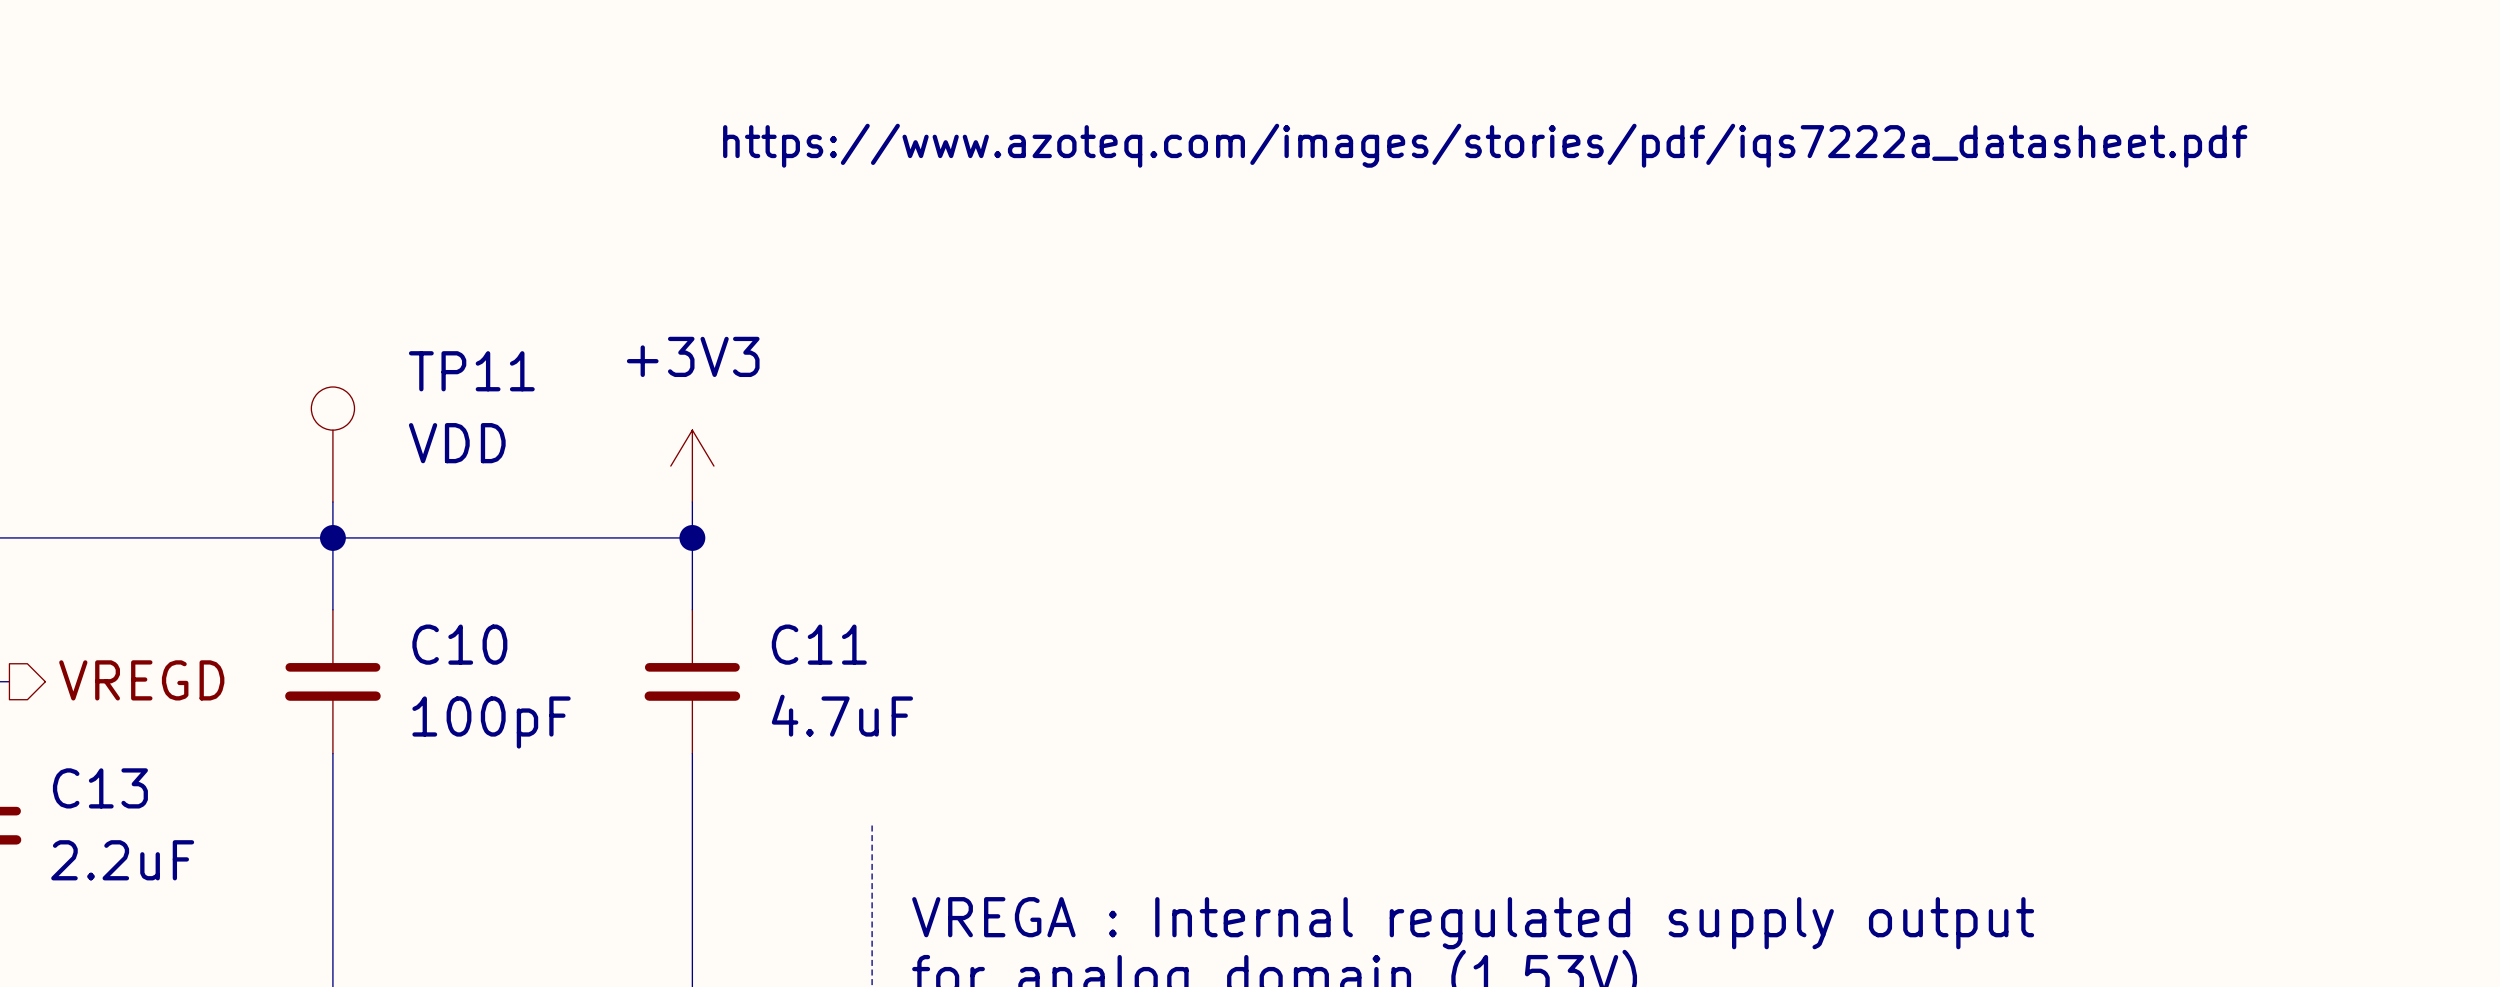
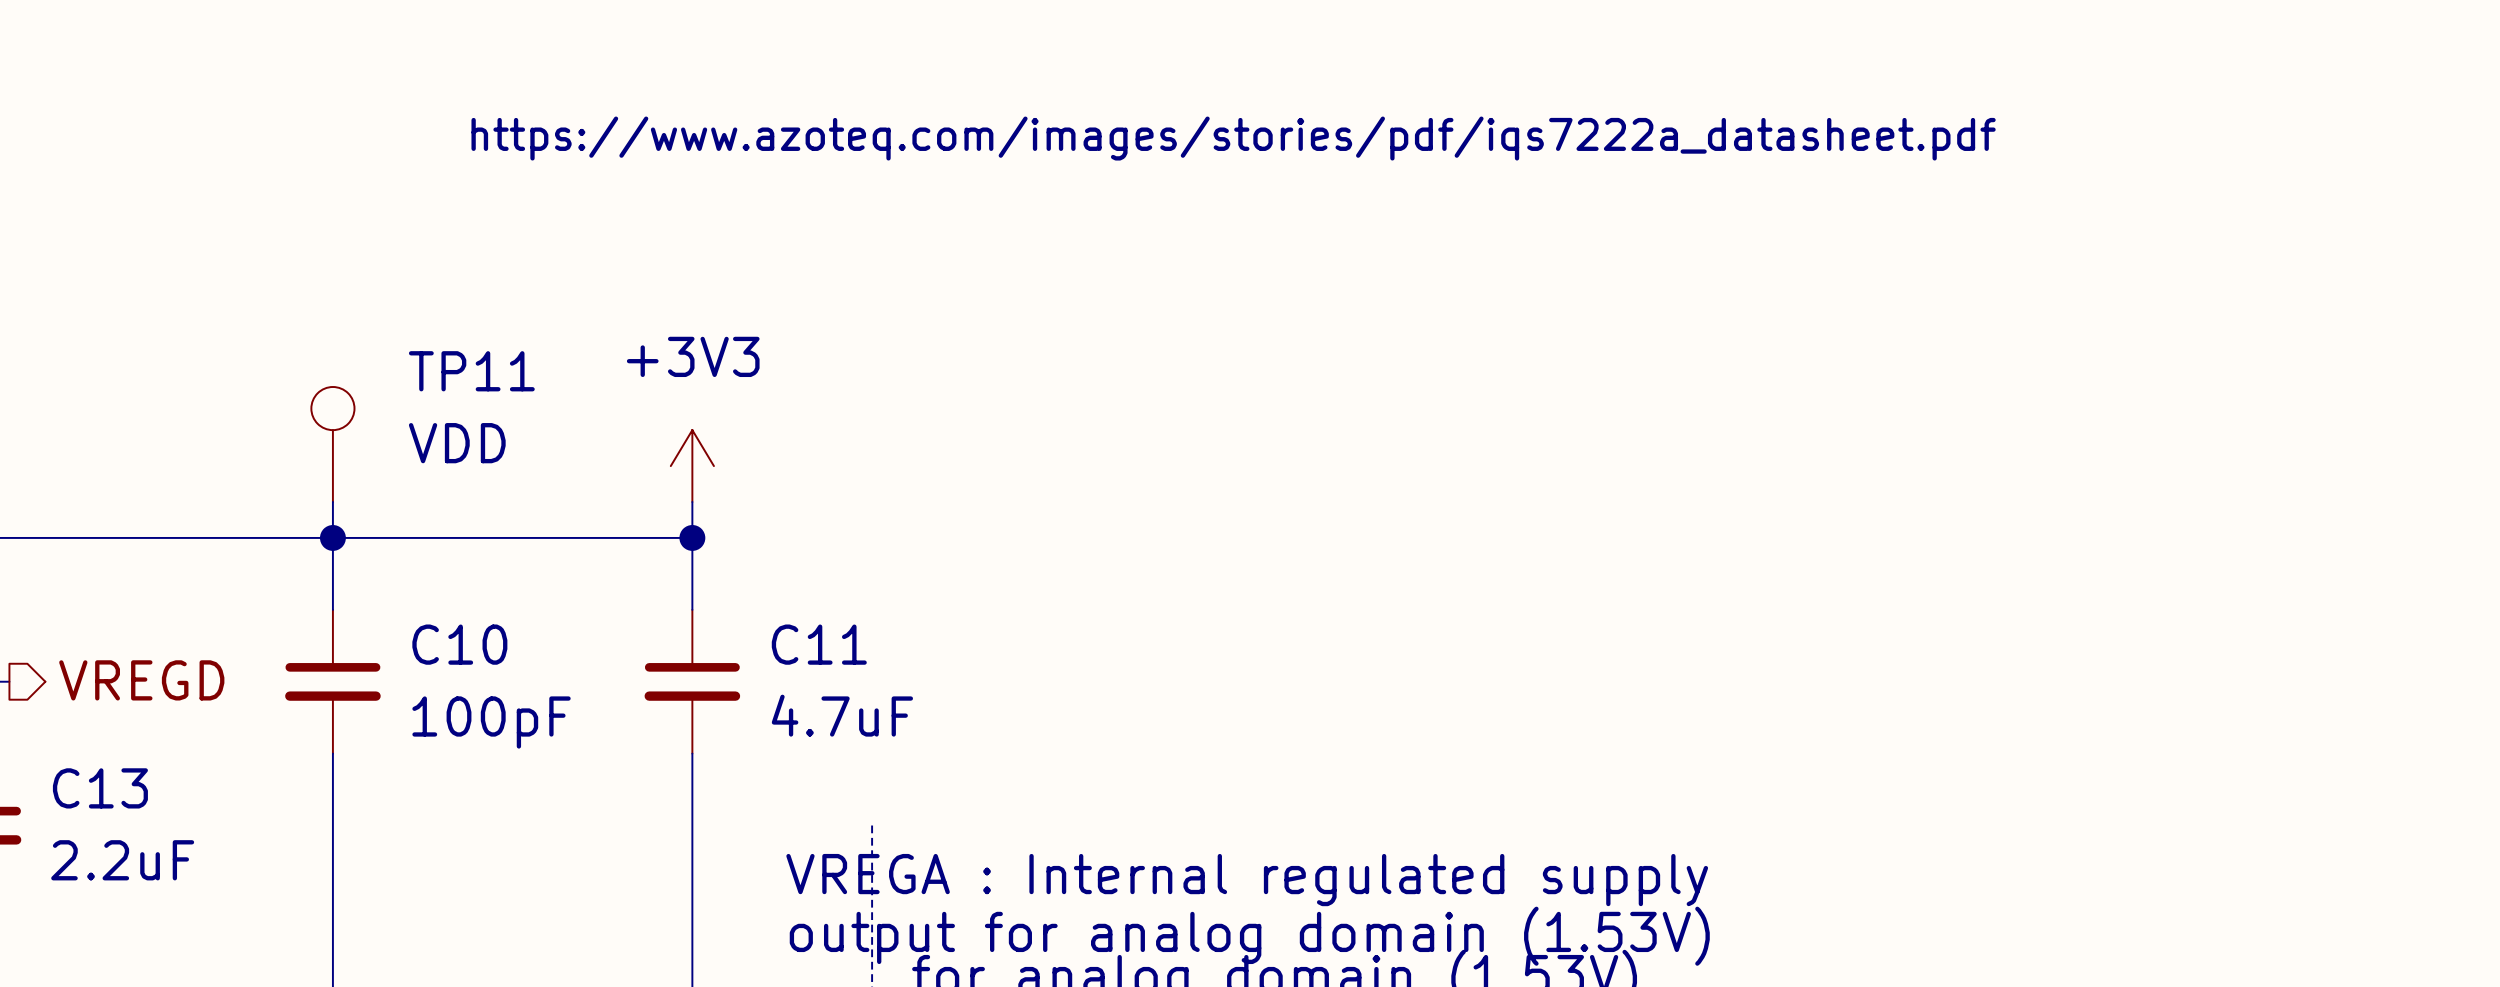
text position: https://www.azoteq.com/images/stories/pdf/iqs7222a_datasheet.pdf (1485, 145) -> https://www.azoteq.com/images/stories/pdf/iqs7222a_datasheet.pdf (1233, 138)
text: VREGA : Internal regulated supply output (1473, 923) -> VREGA : Internal regulated supply (1247, 880)
text: none -> output for analog domain (1.53V) (1249, 936)

